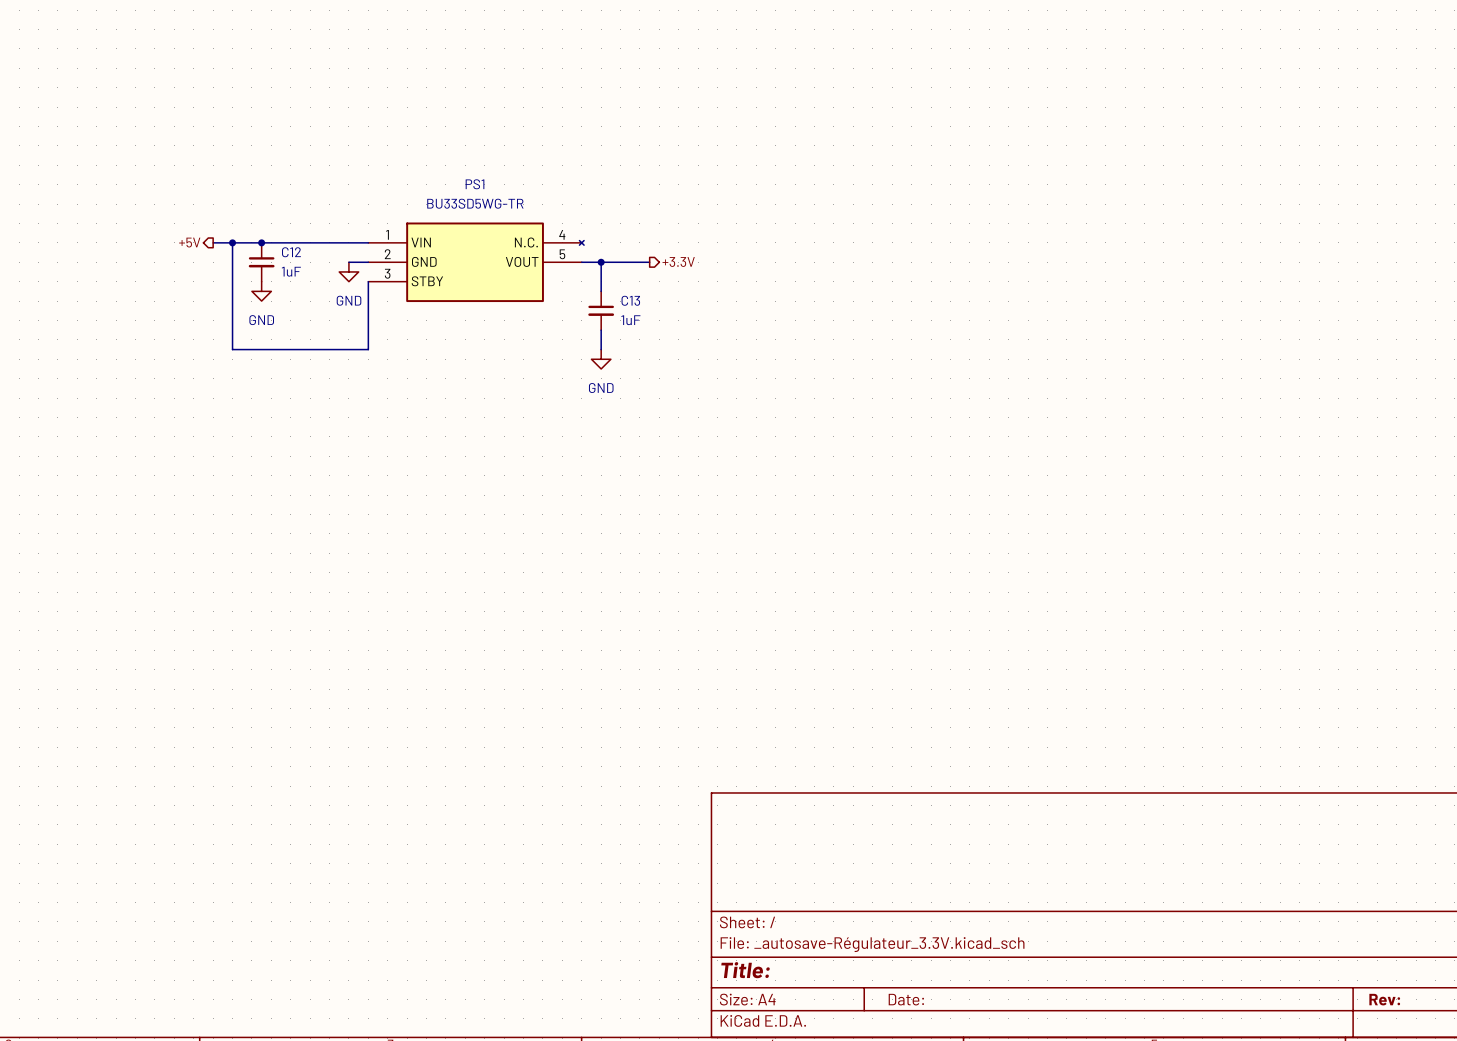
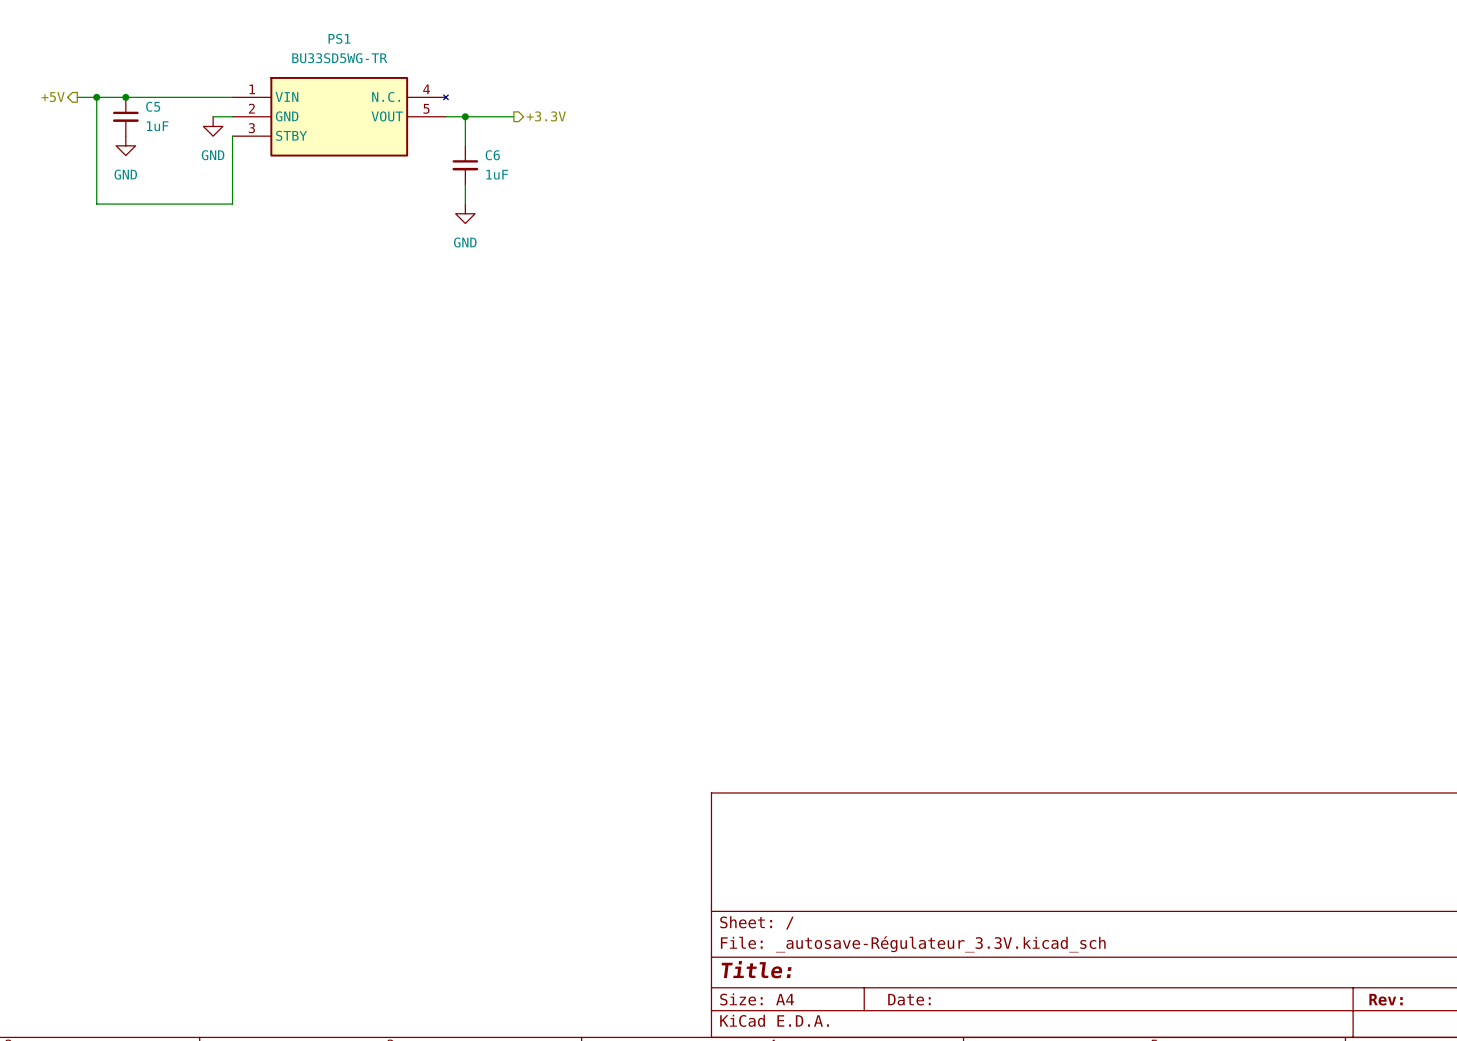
hierarchical label: none -> +5V (53, 97)
wire: none -> (77, 97) (232, 97)
wire: none -> (96, 97) (96, 204) (232, 204) (232, 136)
junction: none -> (96, 97)
junction: none -> (125, 97)
C5: none -> 1uF (125, 116)
wire: none -> (213, 116) (232, 116)
wire: none -> (445, 116) (513, 116)
wire: none -> (465, 116) (465, 145)
junction: none -> (465, 116)
hierarchical label: none -> +3.3V (546, 116)
power symbol: none -> GND (213, 126)
power symbol: none -> GND (125, 145)
C6: none -> 1uF (465, 165)
wire: none -> (465, 184) (465, 204)
power symbol: none -> GND (465, 213)
hierarchical label: +5V (189, 242) -> none
wire: (213, 242) (368, 242) -> none
wire: (232, 242) (232, 349) (368, 349) (368, 281) -> none
junction: (232, 242) -> none
junction: (261, 242) -> none
hierarchical label: +3.3V (678, 261) -> none
C12: 1uF (261, 262) -> none
wire: (348, 262) (368, 262) -> none
PS1 position: (476, 262) -> (340, 116)
wire: (581, 262) (649, 262) -> none
wire: (601, 262) (601, 291) -> none
junction: (601, 262) -> none
power symbol: GND (348, 271) -> none
power symbol: GND (261, 291) -> none
C13: 1uF (601, 310) -> none
wire: (601, 330) (601, 349) -> none
power symbol: GND (601, 359) -> none

